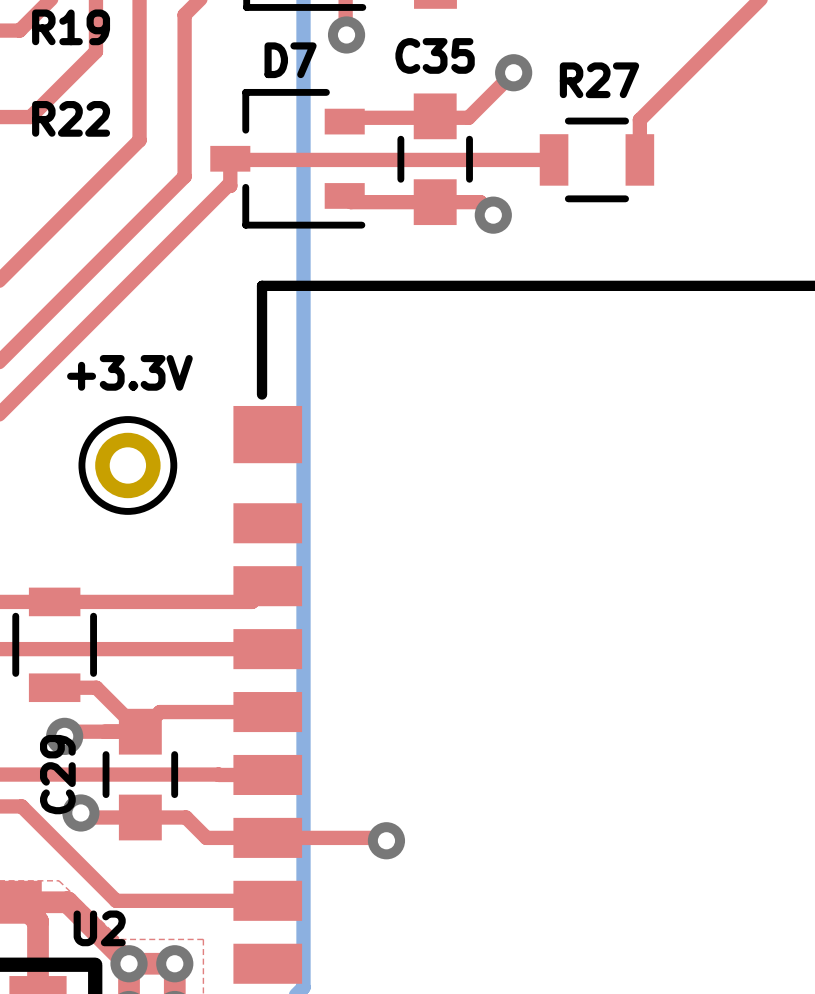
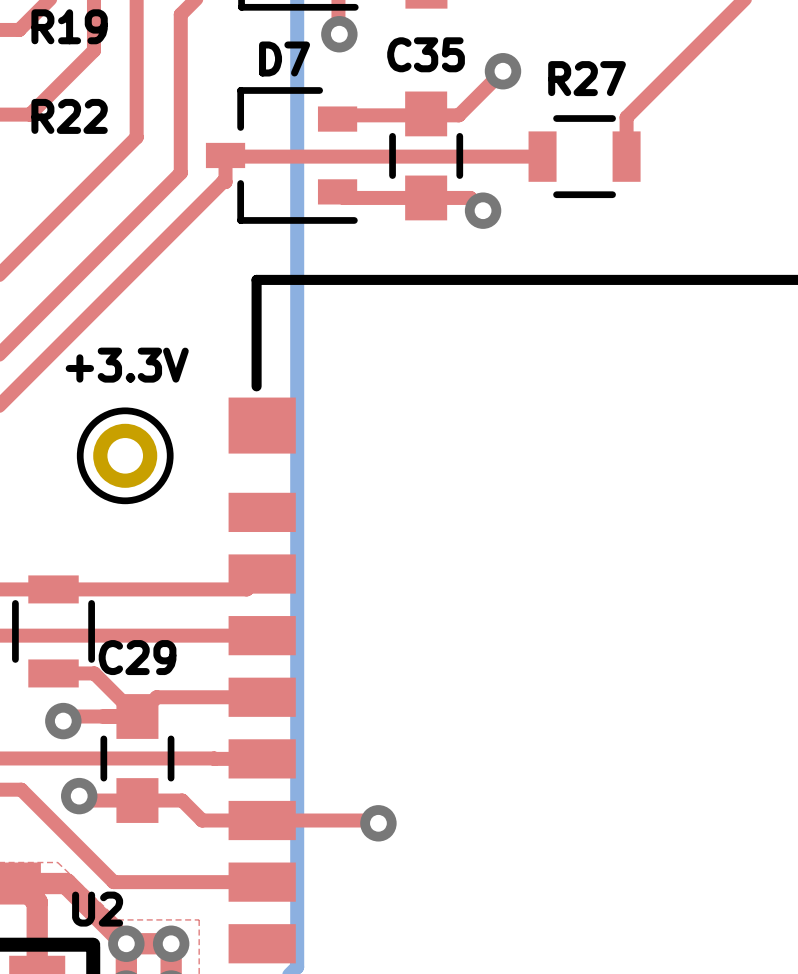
C29 name rotation: 0° (57, 774) -> 90° clockwise (137, 657)
C29 name position: C29 (57, 774) -> C29 (137, 657)

